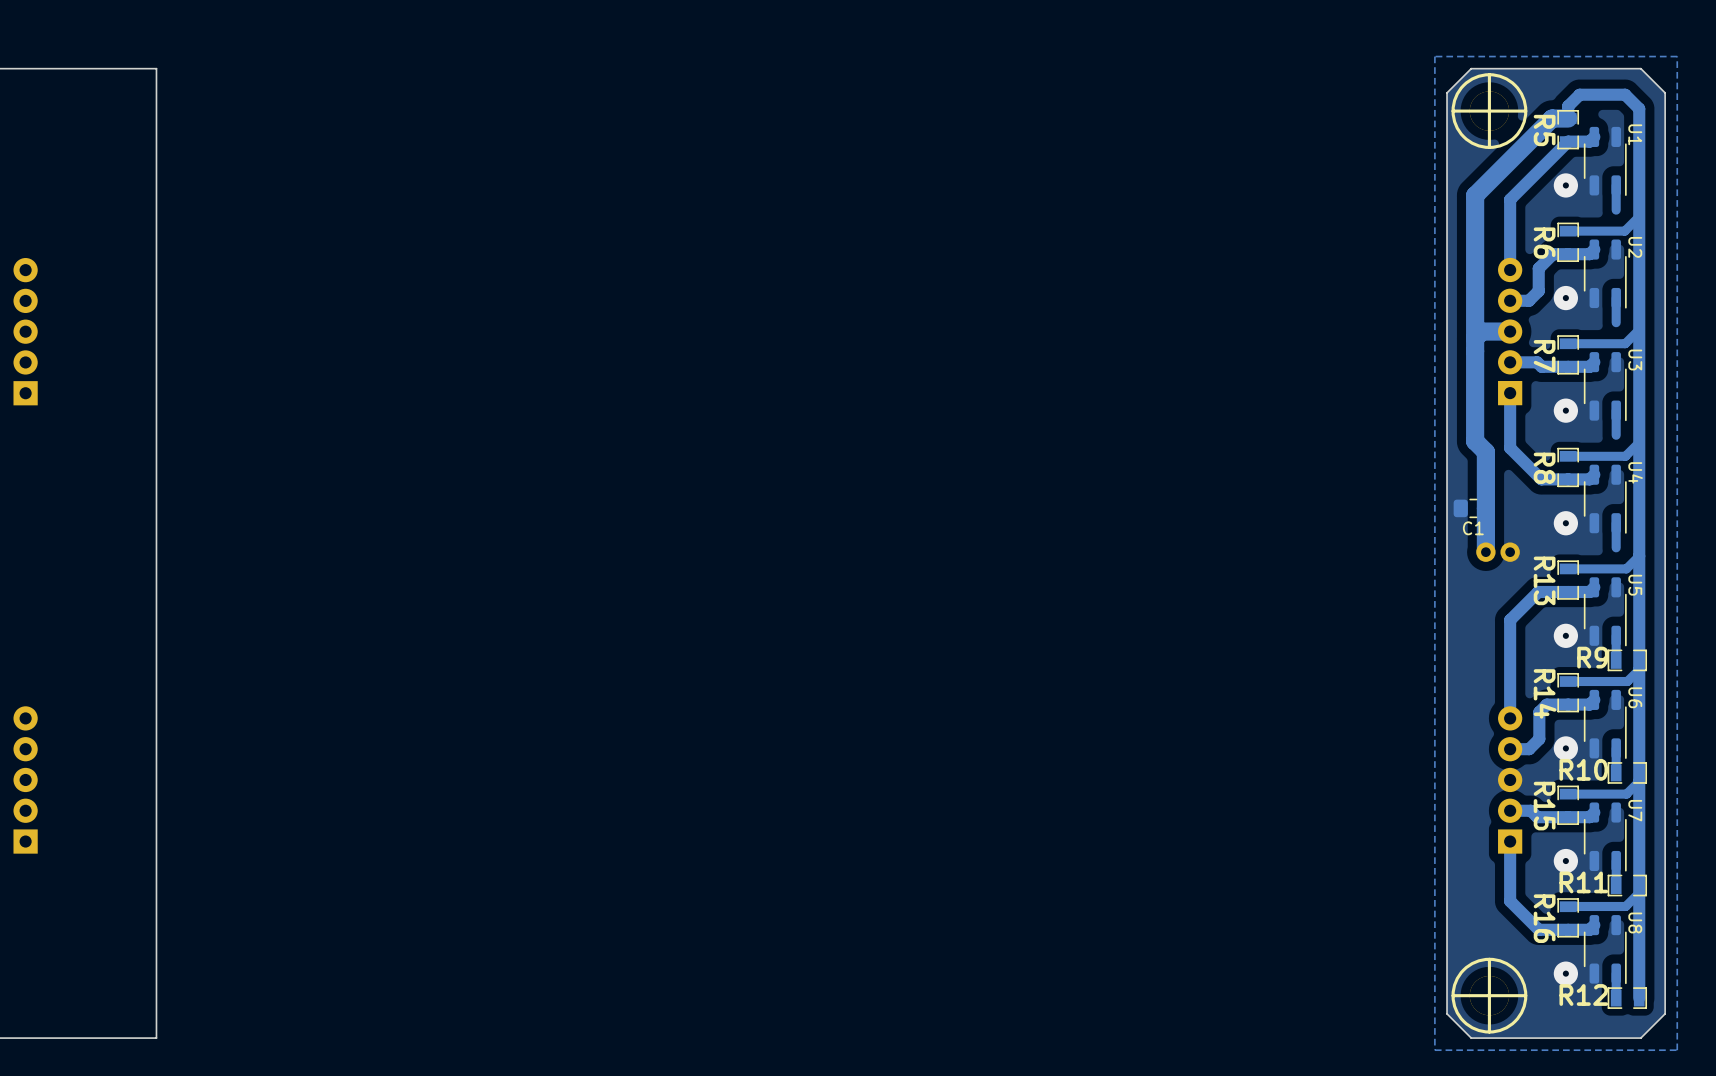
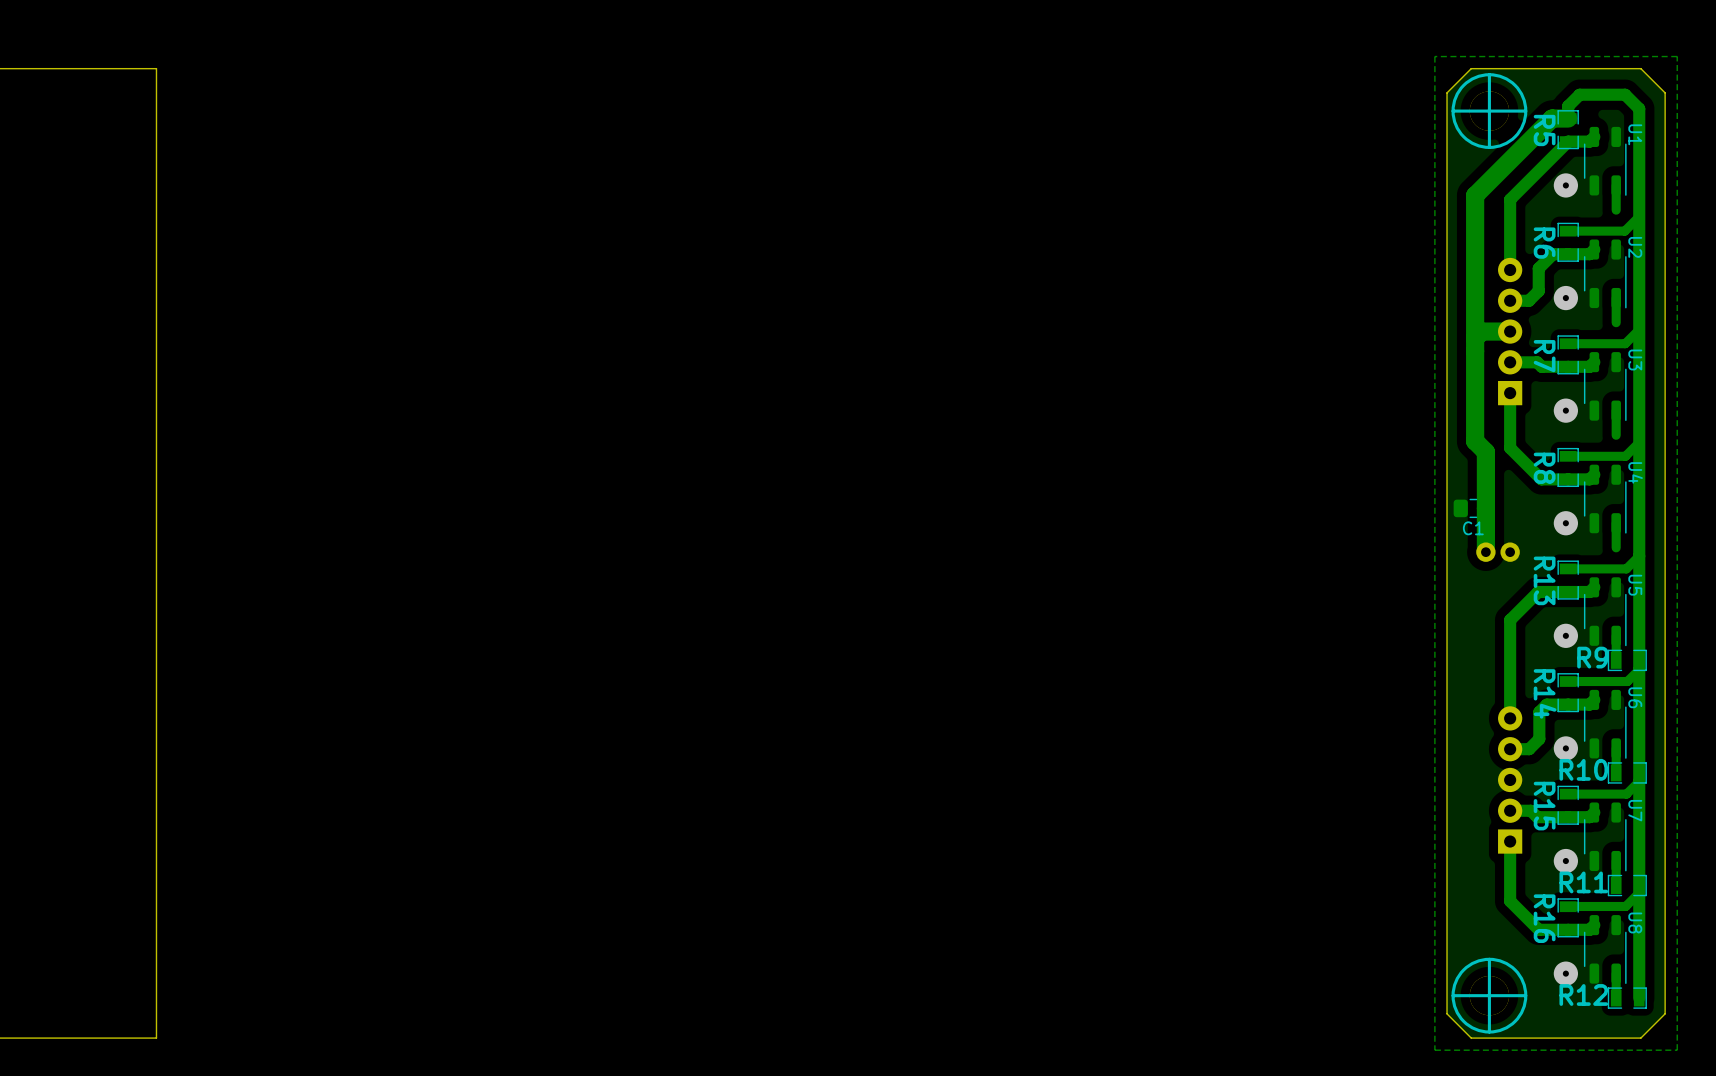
part: (25, 331) -> none
part: (25, 779) -> none

